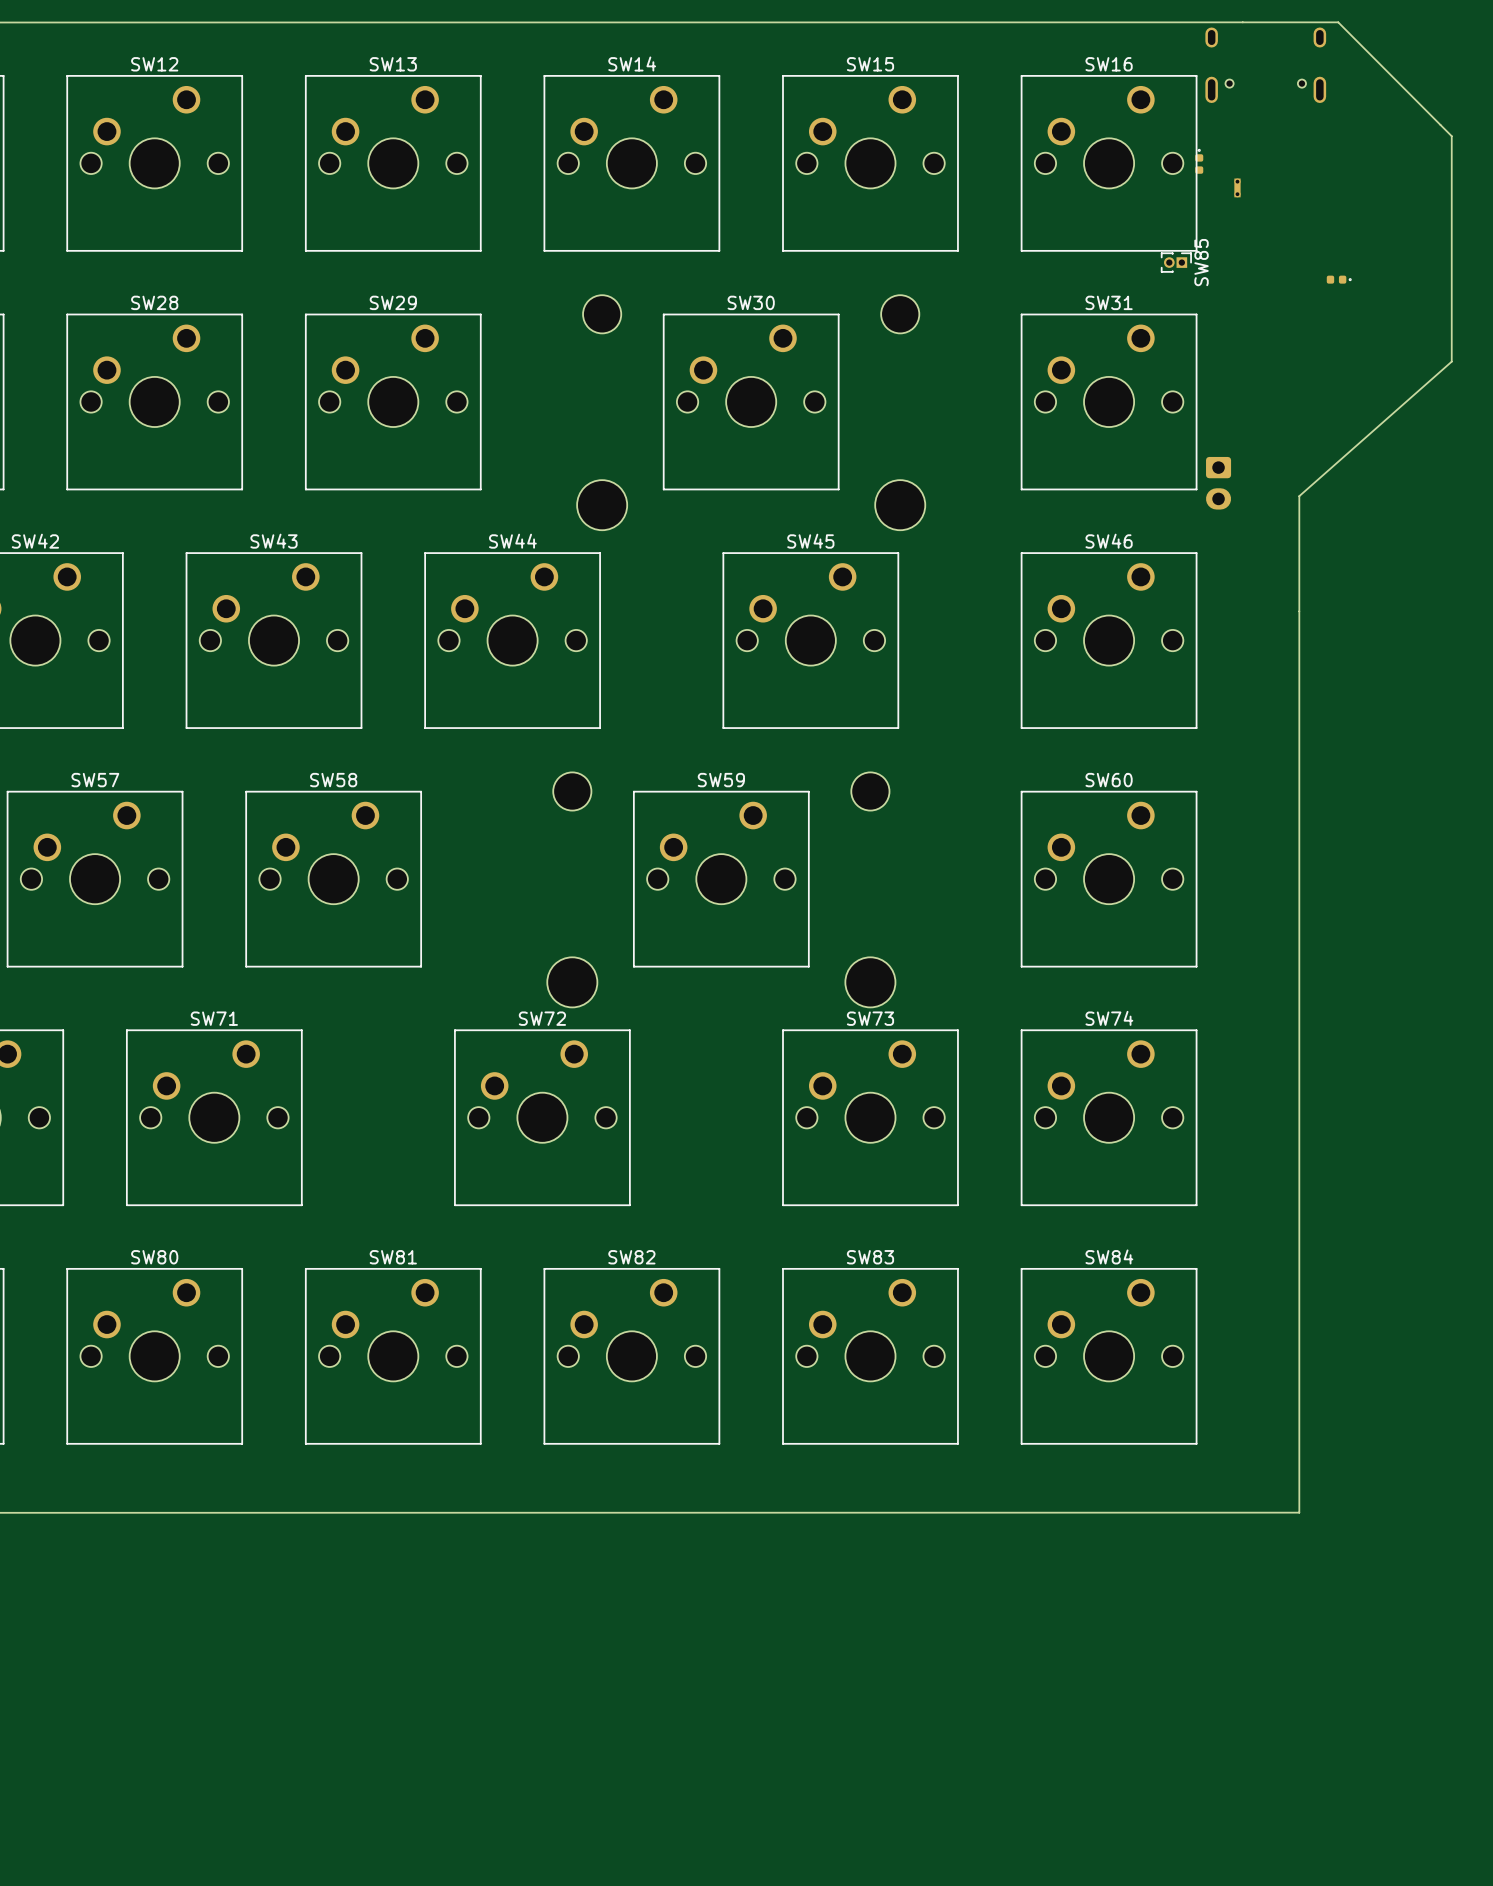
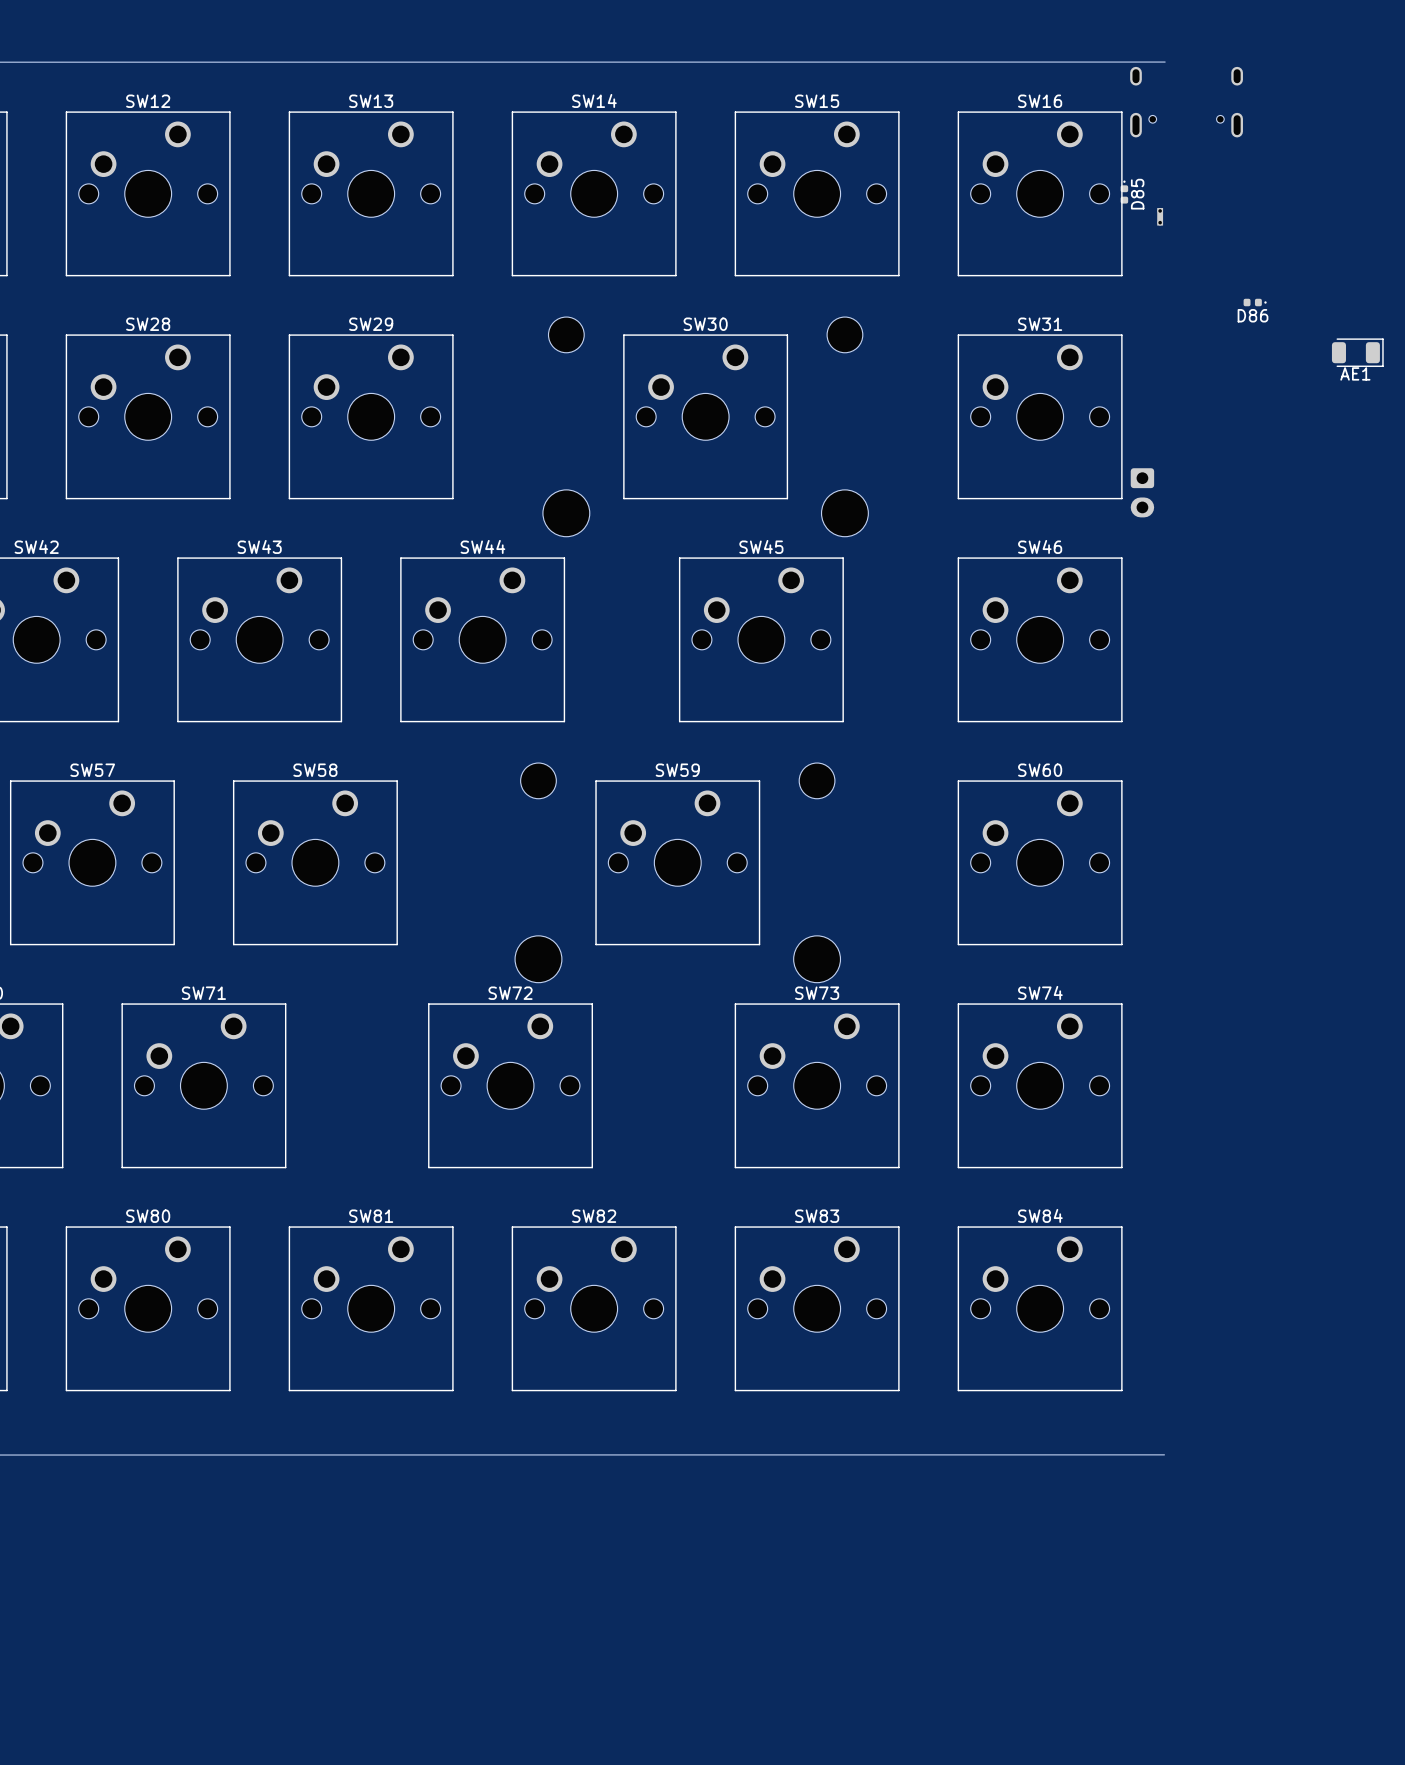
board edge: (1242, 22) (1338, 22) (1451, 136) (1451, 361) (1299, 496) (1299, 1512) (1242, 1512) -> none
D85 name: none -> D85 (1137, 194)
SW85: (1176, 262) -> none
D86 name: none -> D86 (1253, 315)
AE1: none -> (1357, 352)

